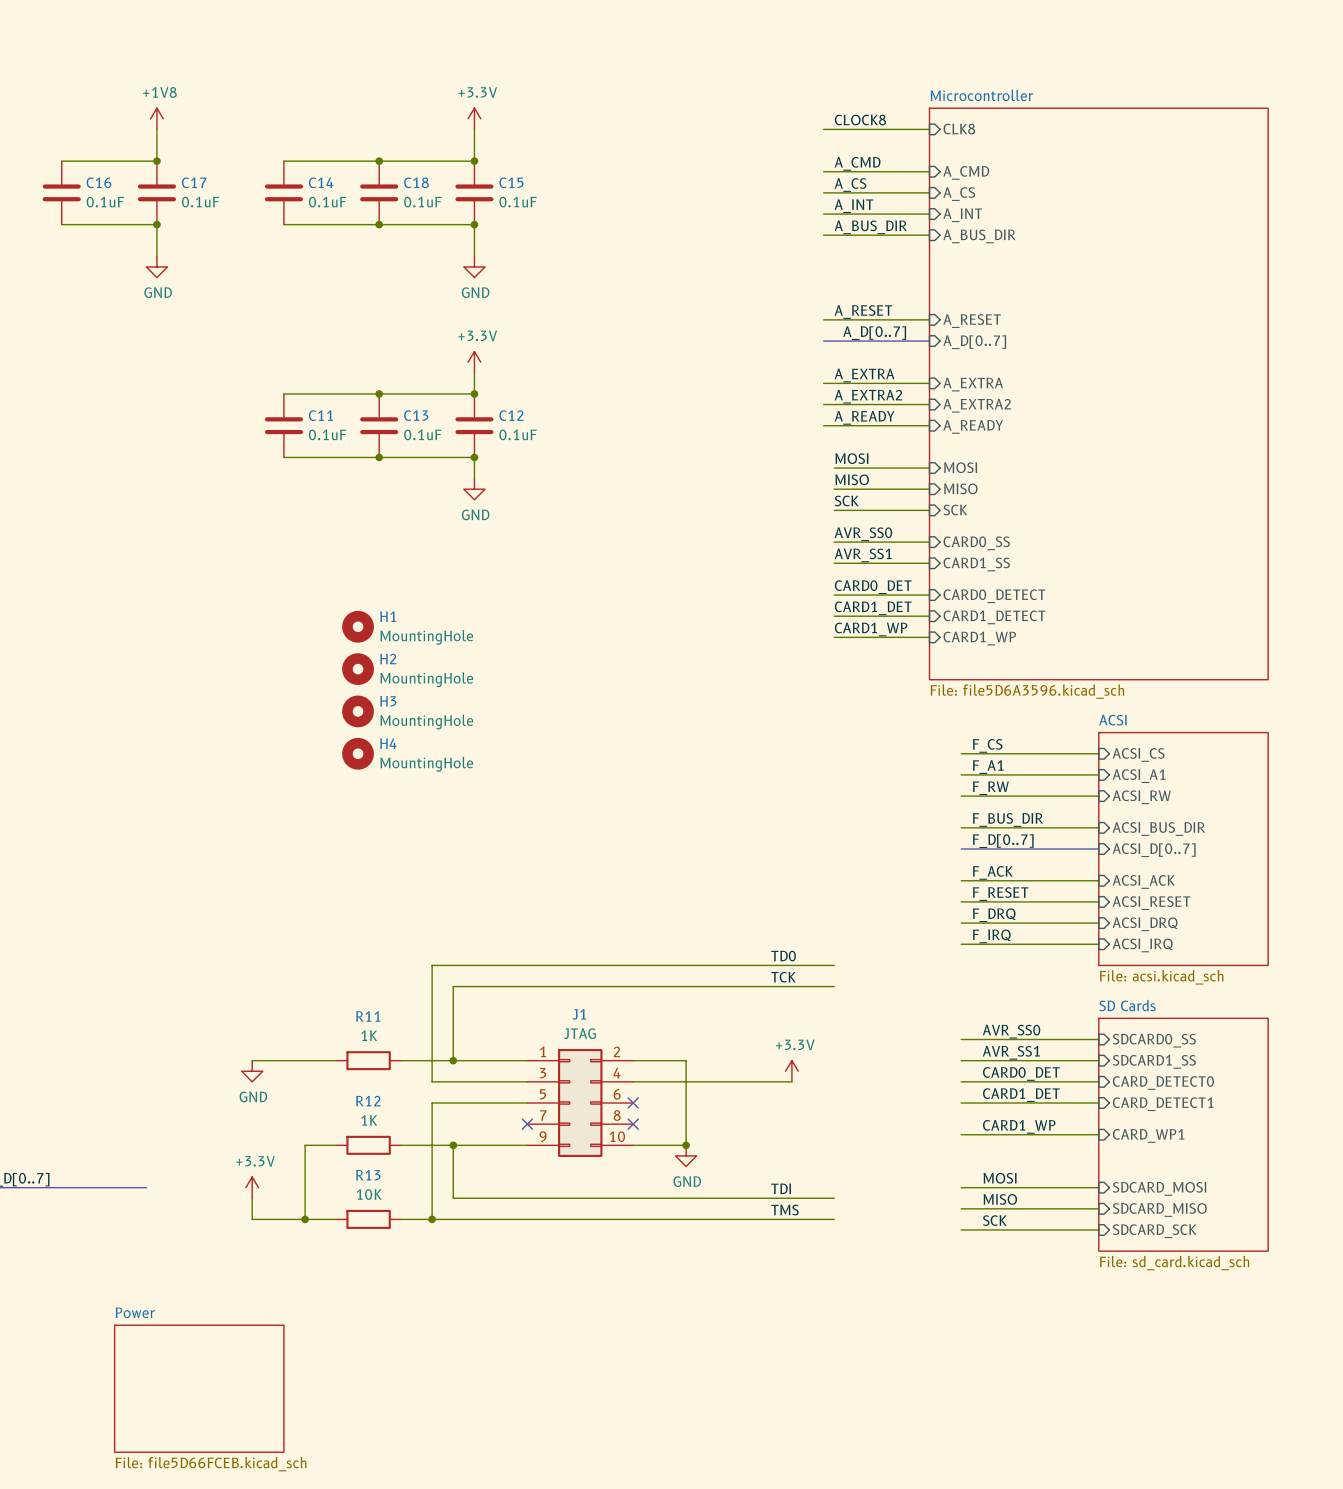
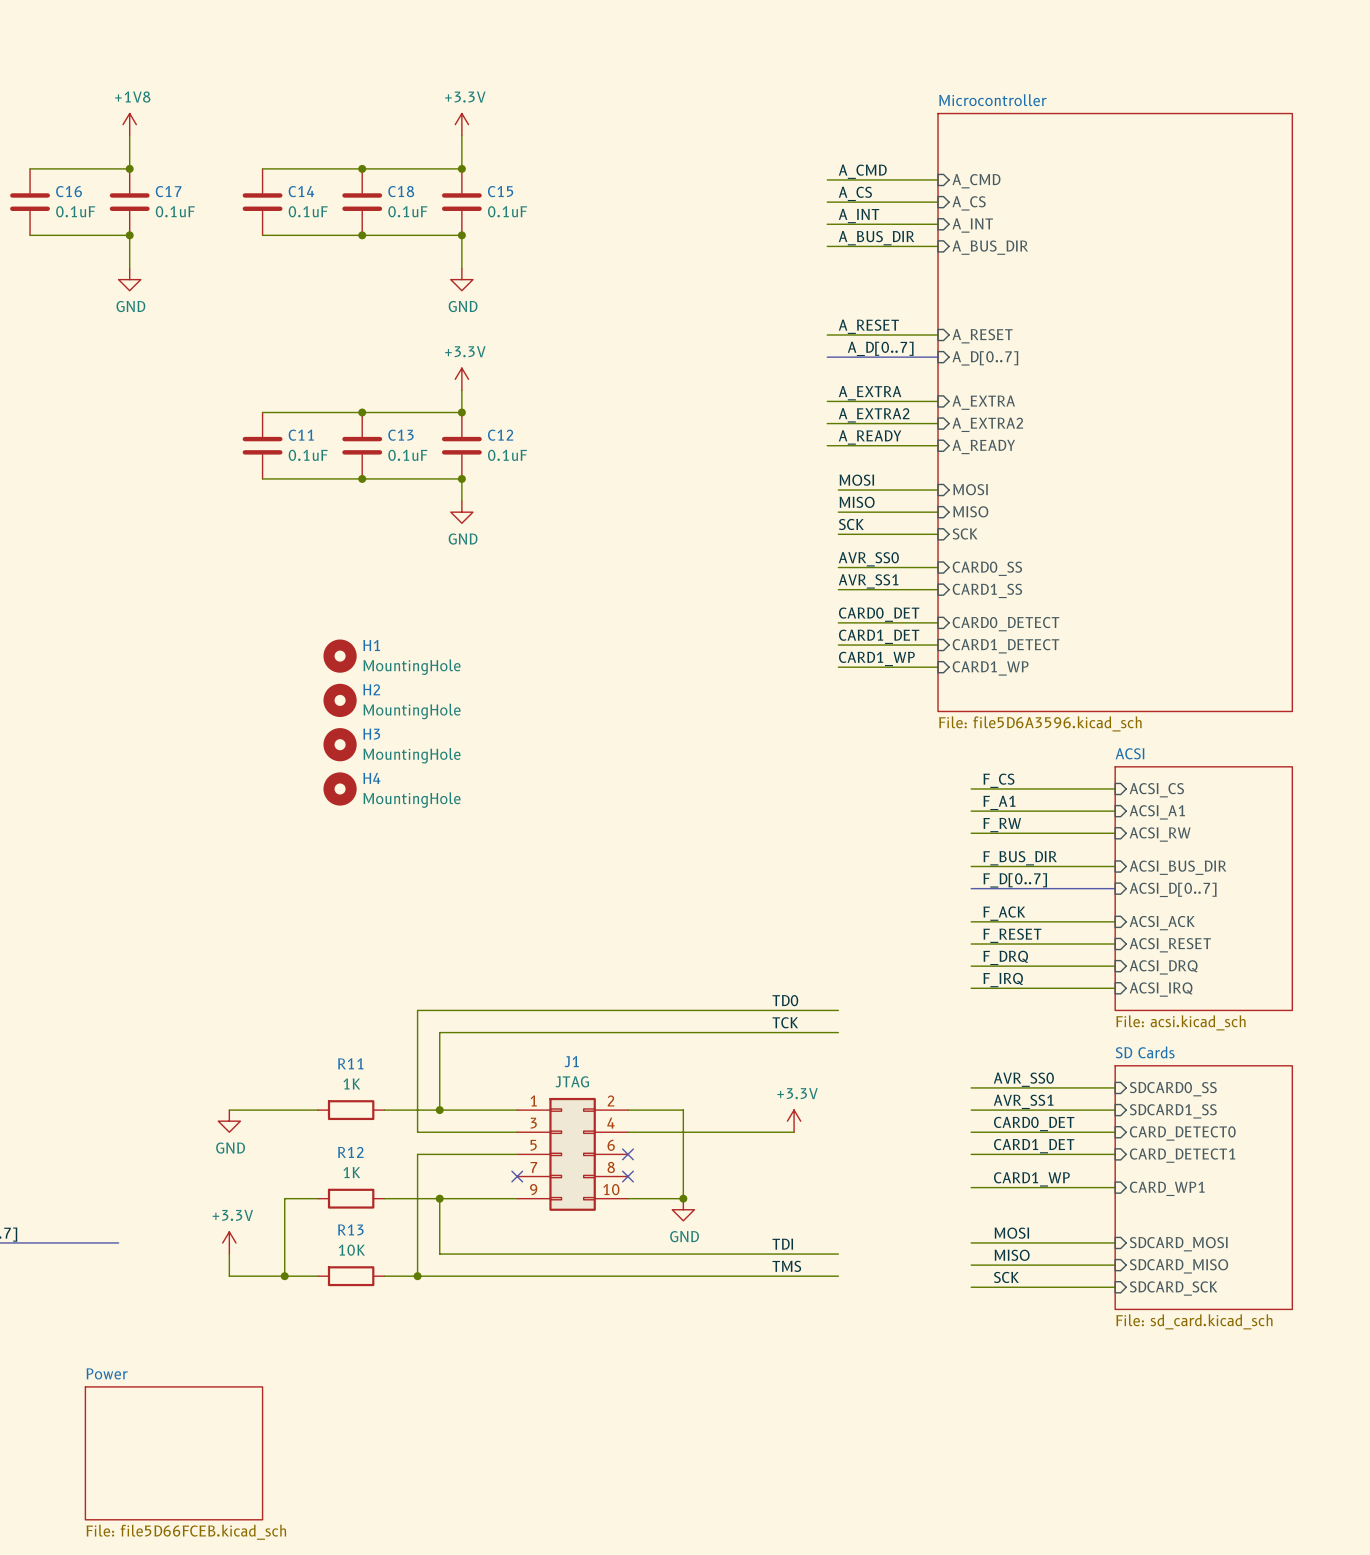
label: CLOCK8 (860, 120) -> none
wire: (823, 129) (929, 129) -> none
sheet pin: CLK8 (959, 129) -> none

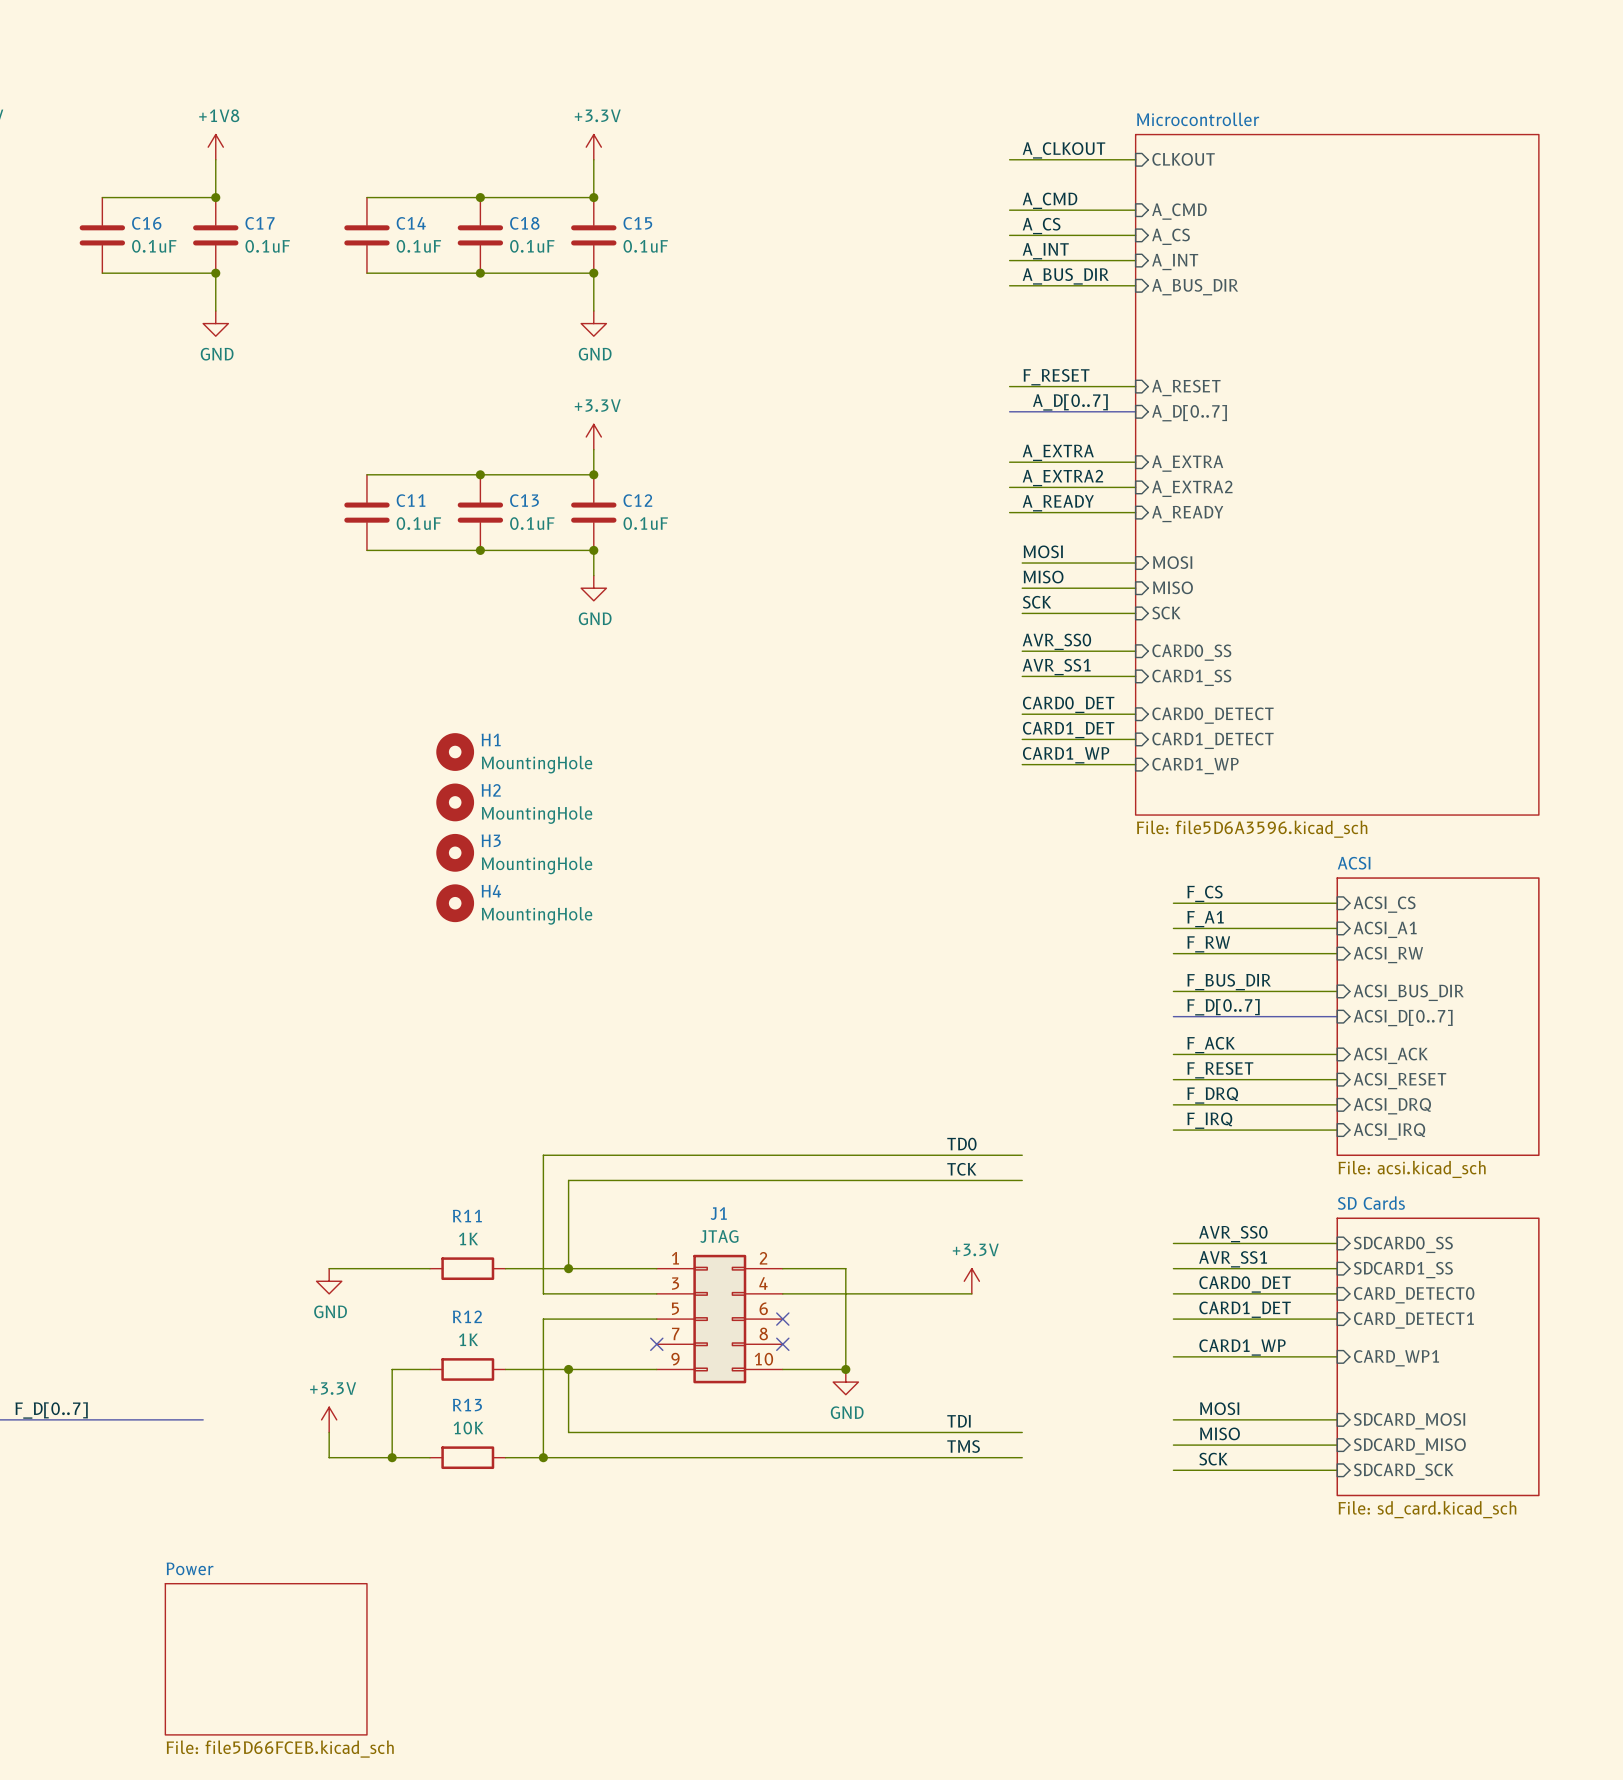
label: none -> A_CLKOUT (1064, 150)
wire: none -> (1009, 159) (1135, 159)
sheet pin: none -> CLKOUT (1183, 159)
label: A_RESET (868, 326) -> F_RESET (1056, 377)

